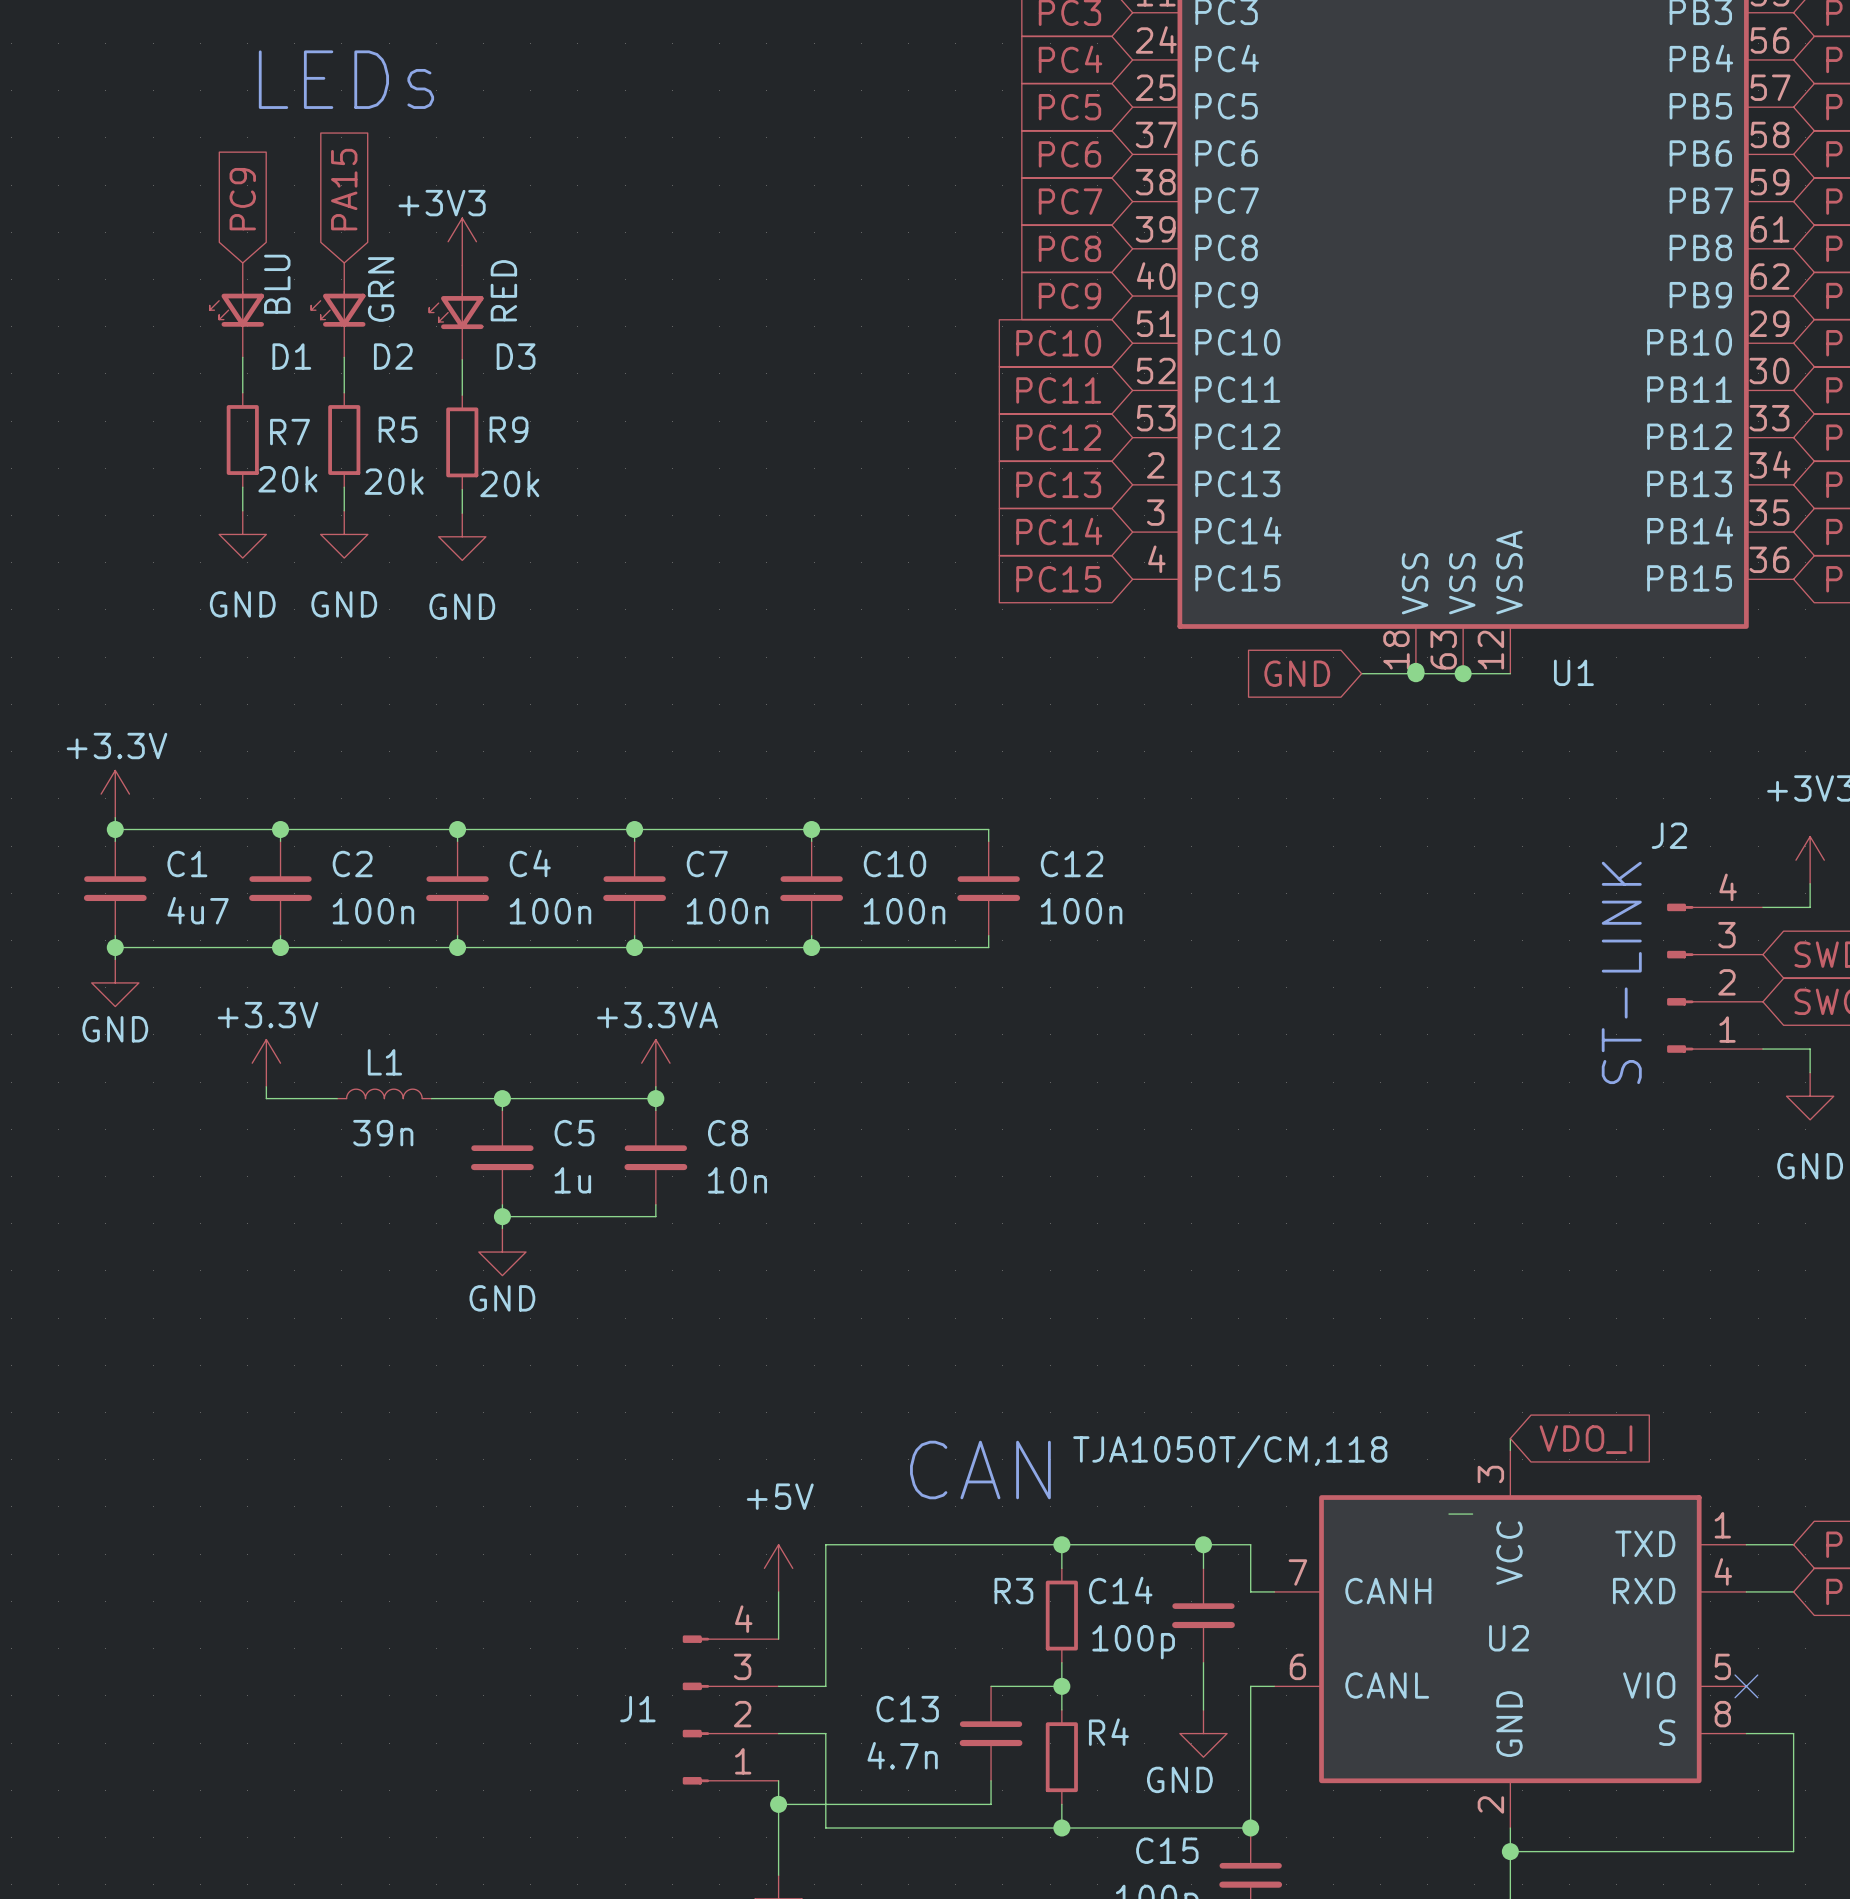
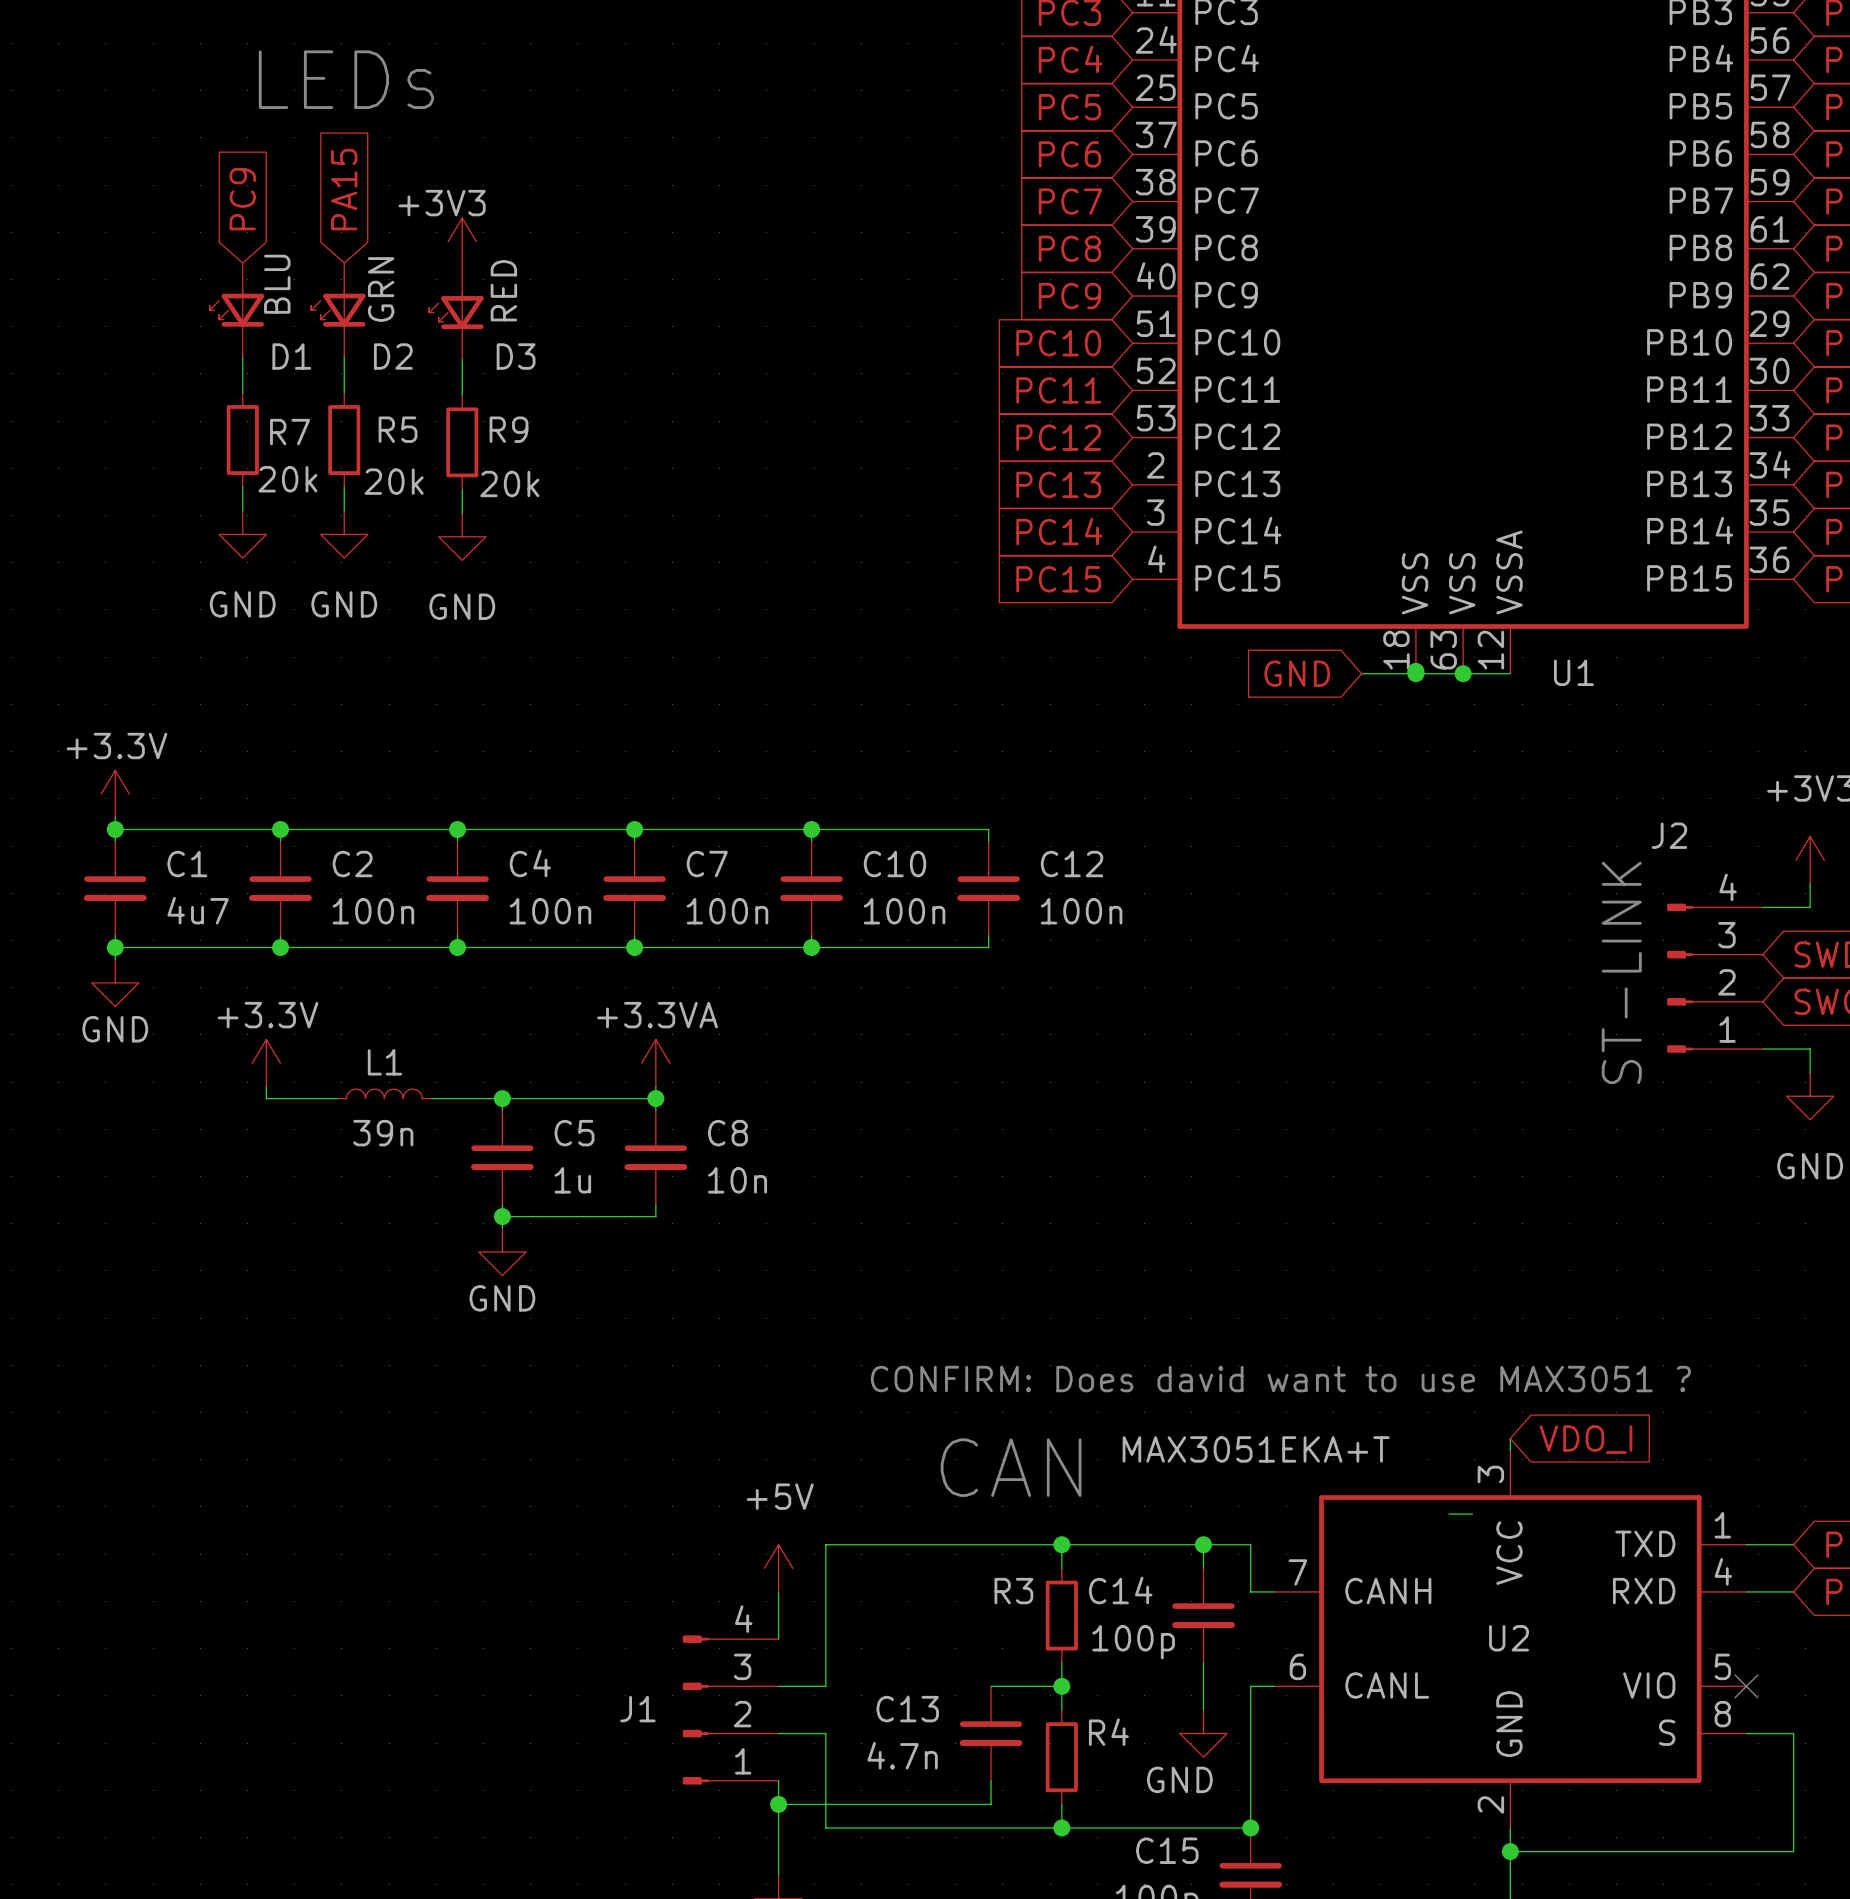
text: none -> CONFIRM: Does david want to use MAX3051 ? (1280, 1379)
U2 value: TJA1050T/CM,118 (1230, 1451) -> MAX3051EKA+T (1256, 1449)
text position: CAN (980, 1470) -> CAN (1011, 1467)

